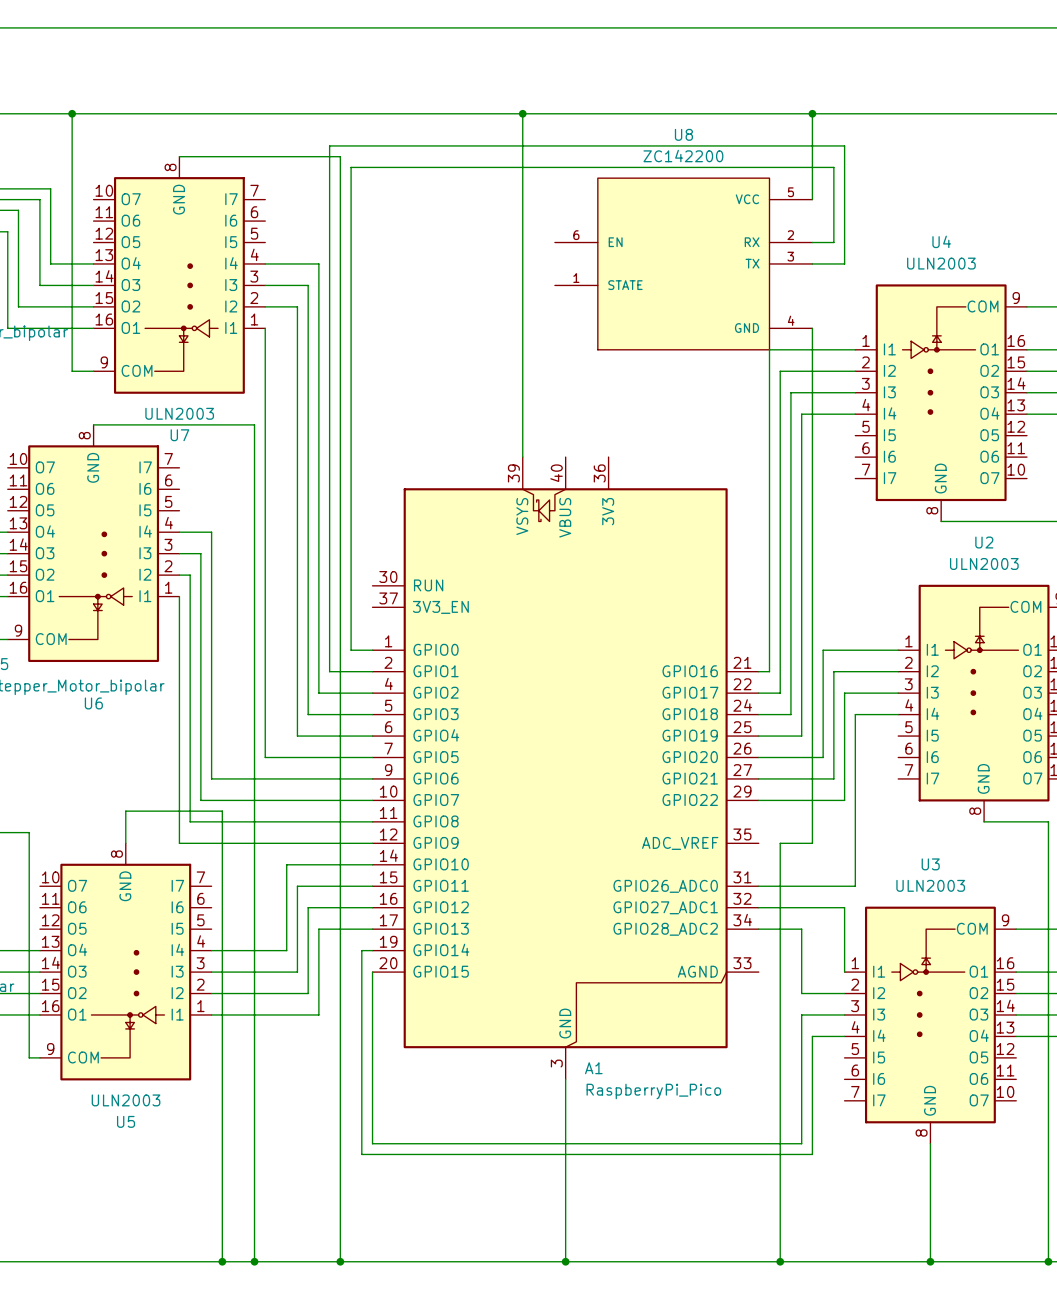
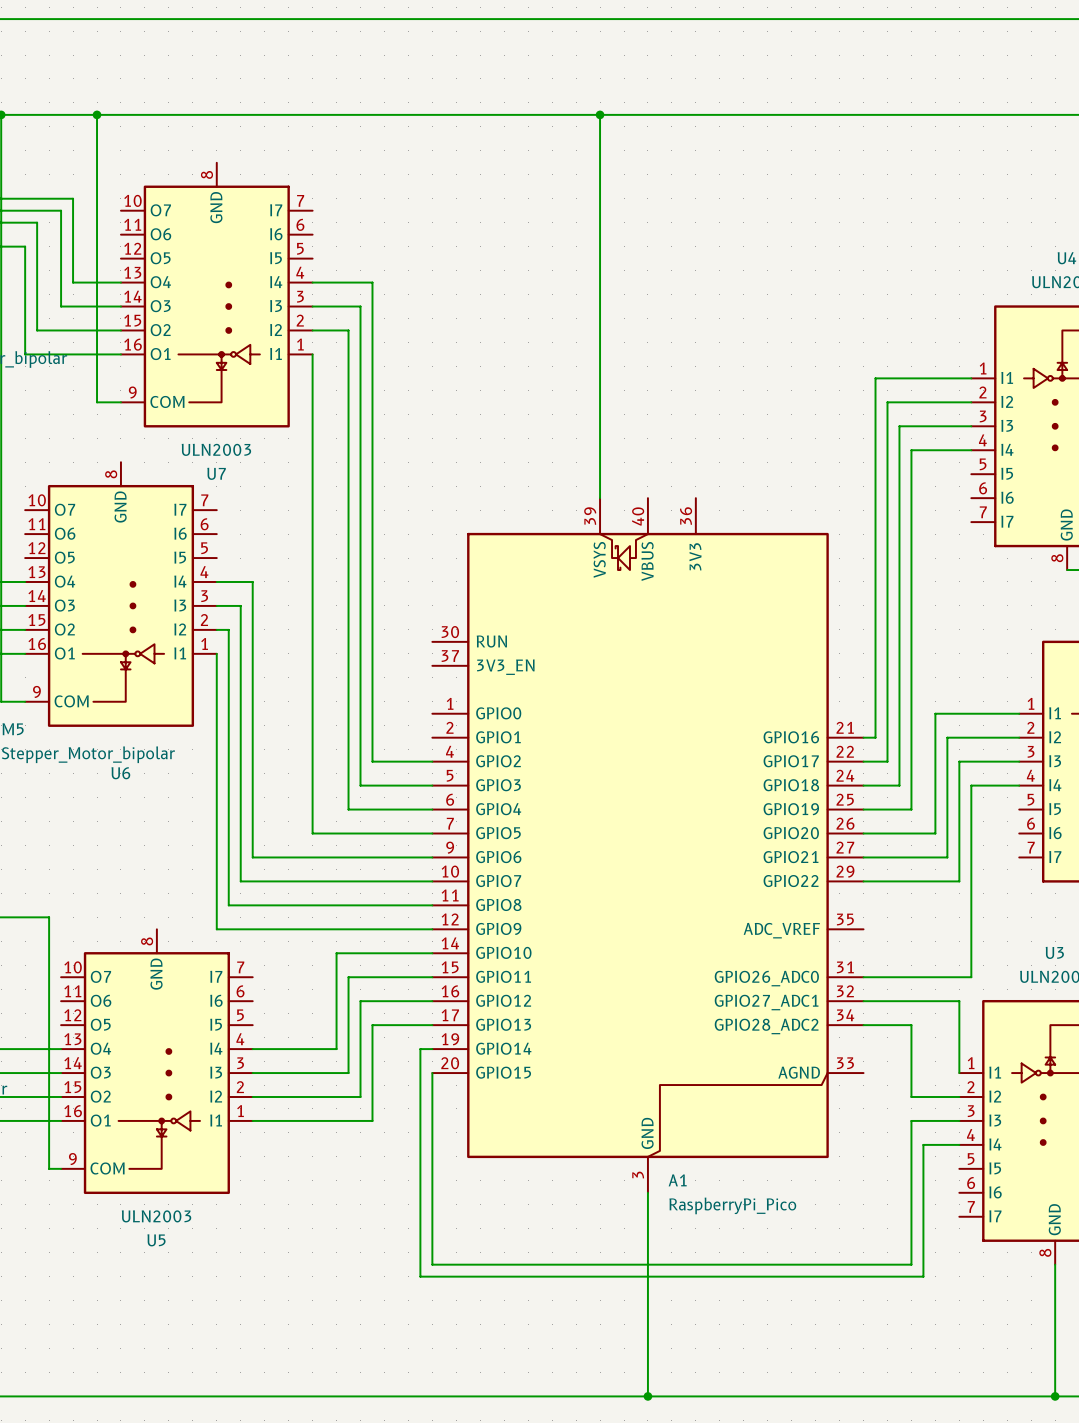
wire: (812, 113) (812, 199) -> none
junction: (812, 113) -> none
wire: (179, 156) (340, 156) (340, 1261) -> none
wire: (812, 242) (833, 242) (833, 167) (351, 167) (351, 650) (372, 650) -> none
U8: ZC142200 (683, 263) -> none
wire: (812, 263) (844, 263) (844, 145) (329, 145) (329, 671) (372, 671) -> none
wire: (812, 328) (812, 843) (780, 843) (780, 1261) -> none
wire: (93, 424) (254, 424) (254, 1261) -> none
wire: (125, 843) (125, 811) (222, 811) (222, 1261) -> none
junction: (222, 1261) -> none
junction: (254, 1261) -> none
junction: (340, 1261) -> none
junction: (780, 1261) -> none

